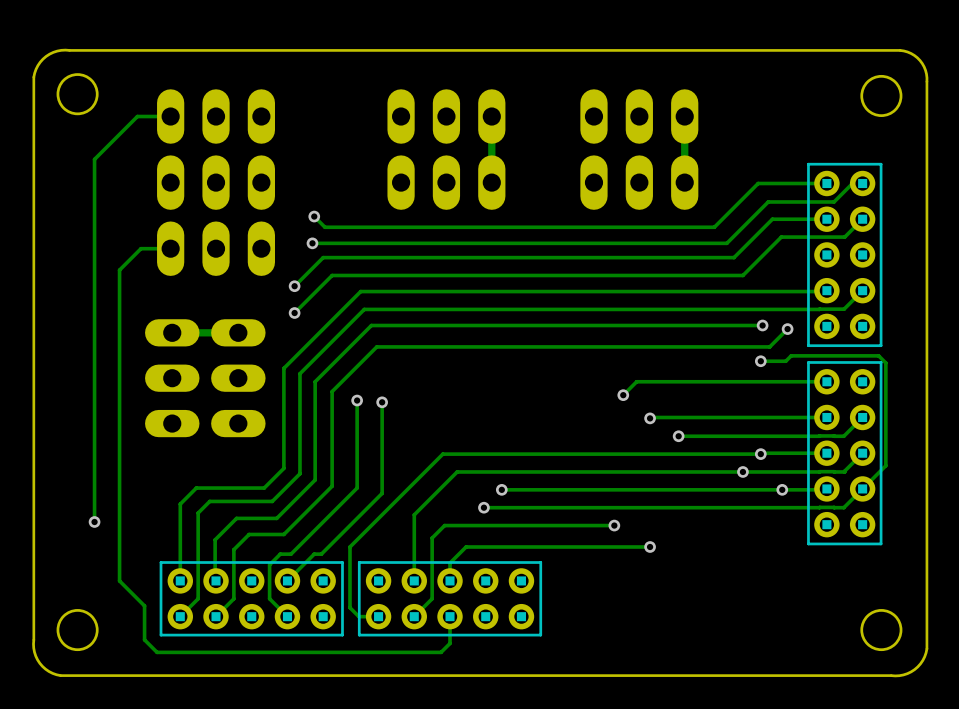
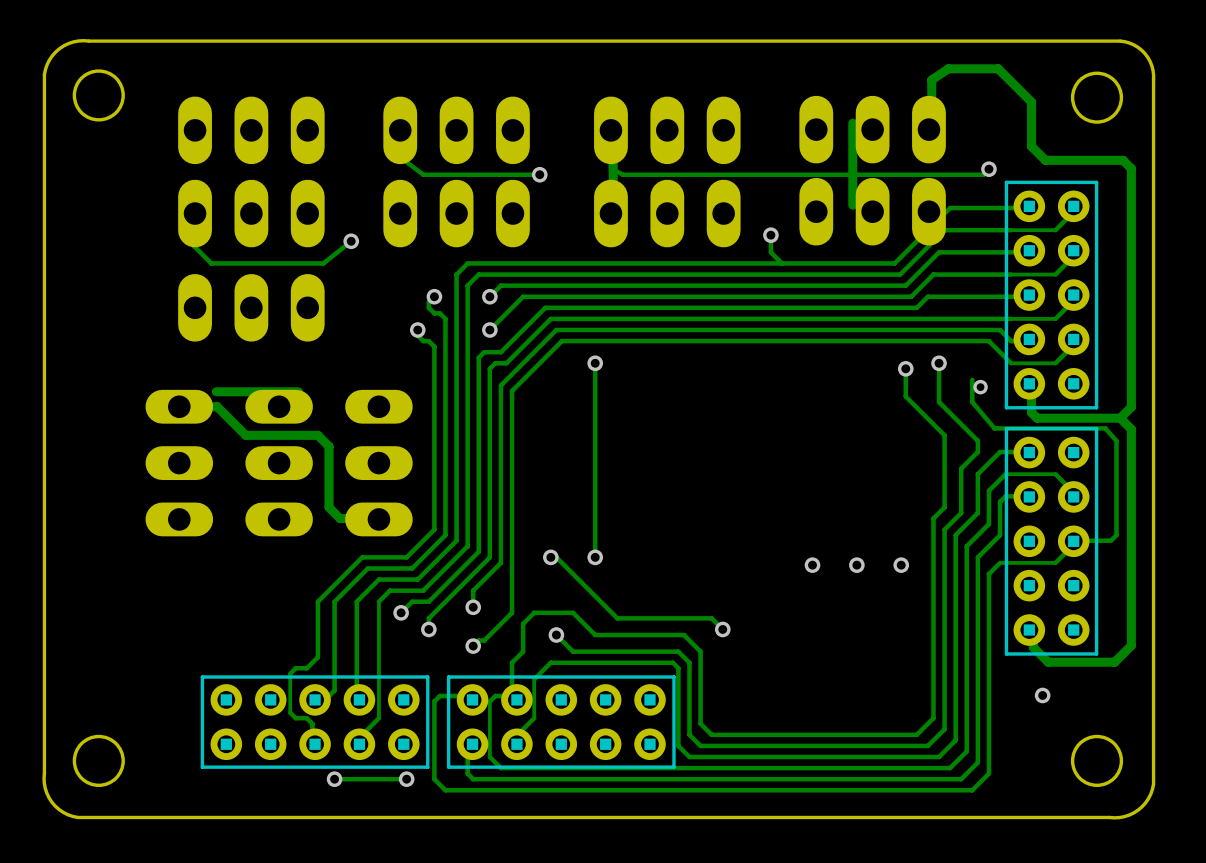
track: (170, 116) (137, 116) (94, 159) (94, 521) -> none
part position: (216, 116) -> (251, 130)
part: (446, 116) -> none
part: (639, 116) -> none
part: none -> (872, 129)
track: none -> (928, 129) (931, 126) (931, 79) (948, 68) (998, 68) (1031, 102) (1031, 146) (1045, 160) (1123, 160) (1131, 168) (1131, 407) (1120, 418)
track: none -> (400, 130) (400, 157) (423, 174) (539, 174)
part: none -> (456, 130)
track: none -> (610, 130) (610, 168) (622, 174) (983, 174) (988, 169)
part: none -> (667, 130)
via: none -> (988, 169)
via: none -> (539, 174)
part position: (216, 182) -> (251, 213)
part: (446, 182) -> none
part: (639, 182) -> none
track: (826, 183) (758, 183) (714, 227) (324, 227) (314, 216) -> none
track: (862, 183) (852, 183) (834, 201) (768, 201) (726, 243) (312, 243) -> none
track: none -> (1033, 208) (950, 208) (894, 263) (467, 263) (456, 274) (456, 540) (417, 579) (378, 579) (356, 601) (356, 696)
track: none -> (1077, 208) (1055, 230) (944, 230) (900, 274) (478, 274) (467, 285) (467, 546) (423, 590) (390, 590) (378, 601) (378, 718) (356, 740)
part: none -> (872, 211)
track: none -> (195, 213) (194, 246) (211, 263) (323, 263) (351, 241)
part: none -> (456, 213)
part: none -> (667, 213)
track: none -> (770, 235) (770, 252) (782, 263)
via: none -> (770, 235)
via: none -> (351, 241)
via: (314, 216) -> none
track: (826, 219) (772, 219) (734, 257) (323, 257) (294, 286) -> none
track: (862, 219) (844, 237) (781, 237) (742, 275) (332, 275) (294, 313) -> none
track: none -> (1033, 252) (939, 252) (905, 285) (500, 285) (489, 296)
track: none -> (1077, 252) (1055, 274) (933, 274) (911, 296) (523, 296) (489, 330)
via: (312, 243) -> none
track: (170, 248) (141, 248) (119, 270) (119, 580) (144, 605) (144, 639) (157, 652) (441, 652) (450, 643) (450, 616) -> none
part position: (216, 248) -> (251, 307)
track: none -> (434, 296) (428, 302) (428, 307) (434, 313) (439, 313) (445, 318) (445, 535) (412, 568) (367, 568) (334, 601) (334, 690) (329, 696) (312, 696)
via: none -> (434, 296)
via: none -> (489, 296)
track: none -> (1077, 296) (1055, 318) (550, 318) (506, 363) (495, 363) (489, 368) (489, 557) (428, 618) (428, 629)
track: none -> (417, 330) (417, 335) (423, 341) (428, 341) (434, 346) (434, 529) (406, 557) (362, 557) (317, 601) (317, 657) (306, 668) (295, 668) (290, 673) (290, 712) (295, 718) (306, 718) (312, 723) (312, 740)
via: none -> (417, 330)
via: none -> (489, 330)
via: (294, 286) -> none
track: (826, 290) (360, 291) (283, 368) (283, 468) (264, 488) (196, 488) (180, 504) (180, 580) -> none
track: (862, 290) (844, 309) (364, 309) (299, 373) (299, 473) (272, 501) (209, 501) (198, 513) (198, 598) (180, 616) -> none
track: none -> (1033, 341) (1011, 341) (1000, 330) (556, 330) (500, 385) (500, 562) (473, 590) (473, 607)
track: none -> (1077, 341) (1055, 363) (1011, 363) (988, 341) (561, 341) (512, 391) (512, 612) (484, 640) (478, 640) (473, 646)
track: none -> (595, 363) (595, 557)
via: none -> (595, 363)
track: none -> (939, 363) (939, 402) (977, 440) (977, 452) (961, 468) (961, 513) (944, 529) (944, 729) (927, 745) (700, 745) (689, 734) (689, 662) (678, 651) (573, 651) (556, 635)
via: none -> (939, 363)
via: (294, 313) -> none
track: none -> (905, 368) (905, 396) (944, 435) (944, 507) (933, 518) (933, 718) (916, 734) (711, 734) (700, 723) (700, 651) (683, 635) (595, 635) (573, 612) (534, 612) (523, 623) (523, 651) (512, 662) (512, 696) (495, 696) (489, 701) (489, 757) (500, 768) (950, 768) (966, 751) (966, 546) (988, 524) (988, 490) (1005, 474) (1055, 474) (1077, 496)
via: none -> (905, 368)
track: none -> (972, 379) (972, 402) (994, 428) (1105, 428) (1116, 440) (1116, 535) (1110, 540) (1077, 540) (1055, 562) (1000, 562) (988, 574) (988, 773) (972, 790) (445, 790) (434, 779) (434, 701) (439, 696) (467, 696)
track: (762, 325) (371, 325) (315, 381) (315, 480) (276, 518) (236, 518) (215, 539) (216, 580) -> none
via: (762, 325) -> none
track: none -> (1033, 385) (1031, 387) (1031, 412) (1037, 418) (1120, 418)
track: (787, 329) (769, 346) (376, 346) (332, 391) (332, 486) (283, 534) (249, 534) (233, 549) (233, 598) (216, 616) -> none
track: none -> (179, 406) (217, 406) (245, 435) (317, 435) (329, 446) (329, 507) (340, 518) (378, 519)
track: none -> (1120, 418) (1131, 429) (1131, 645) (1114, 662) (1048, 662) (1033, 647) (1033, 629)
track: (760, 361) (785, 361) (791, 355) (878, 355) (885, 363) (885, 465) (843, 507) (483, 507) -> none
via: (760, 361) -> none
part: (172, 378) -> none
part position: (238, 378) -> (279, 463)
track: (826, 381) (636, 381) (623, 395) -> none
track: none -> (1033, 452) (1000, 452) (977, 474) (977, 513) (955, 535) (955, 740) (939, 757) (689, 757) (678, 745) (678, 668) (672, 662) (550, 662) (534, 679) (534, 718) (512, 740)
part: none -> (179, 463)
part: none -> (378, 463)
via: (623, 395) -> none
track: (357, 400) (357, 488) -> (1033, 296) (927, 296) (916, 307) (545, 307) (500, 352) (484, 352) (478, 357) (478, 551) (445, 584)
via: (357, 400) -> none
track: (382, 402) (382, 493) (321, 554) (314, 554) (287, 580) -> none
via: (382, 402) -> none
track: (826, 417) (650, 418) -> none
track: none -> (1033, 496) (1005, 496) (1000, 501) (1000, 535) (977, 557) (977, 762) (961, 779) (473, 779) (467, 773) (467, 740)
track: (862, 417) (843, 436) (678, 436) -> none
via: (650, 418) -> none
via: (678, 436) -> none
track: (826, 453) (442, 454) (349, 546) (349, 607) (358, 616) (378, 616) -> none
track: (862, 453) (844, 471) (457, 471) (414, 514) (414, 580) -> none
via: (760, 454) -> none
track: none -> (550, 557) (556, 557) (617, 618) (711, 618) (722, 629)
via: none -> (550, 557)
via: none -> (595, 557)
via: (742, 471) -> none
via: none -> (812, 565)
via: none -> (856, 565)
via: none -> (901, 565)
track: (826, 488) (501, 489) -> none
via: (501, 489) -> none
via: (782, 489) -> none
track: (343, 501) (291, 554) (280, 554) (269, 564) (269, 598) (287, 616) -> (428, 601) (412, 601) (401, 612)
via: none -> (473, 607)
via: (483, 507) -> none
via: none -> (401, 612)
via: (94, 521) -> none
via: none -> (428, 629)
via: none -> (722, 629)
track: (614, 525) (444, 525) (432, 538) (432, 598) (414, 616) -> none
via: (614, 525) -> none
via: none -> (556, 635)
via: none -> (473, 646)
track: (650, 546) (466, 546) (450, 563) (450, 580) -> none
via: (650, 546) -> none
via: none -> (1042, 695)
via: none -> (334, 779)
track: none -> (406, 779) (334, 779)
via: none -> (406, 779)

